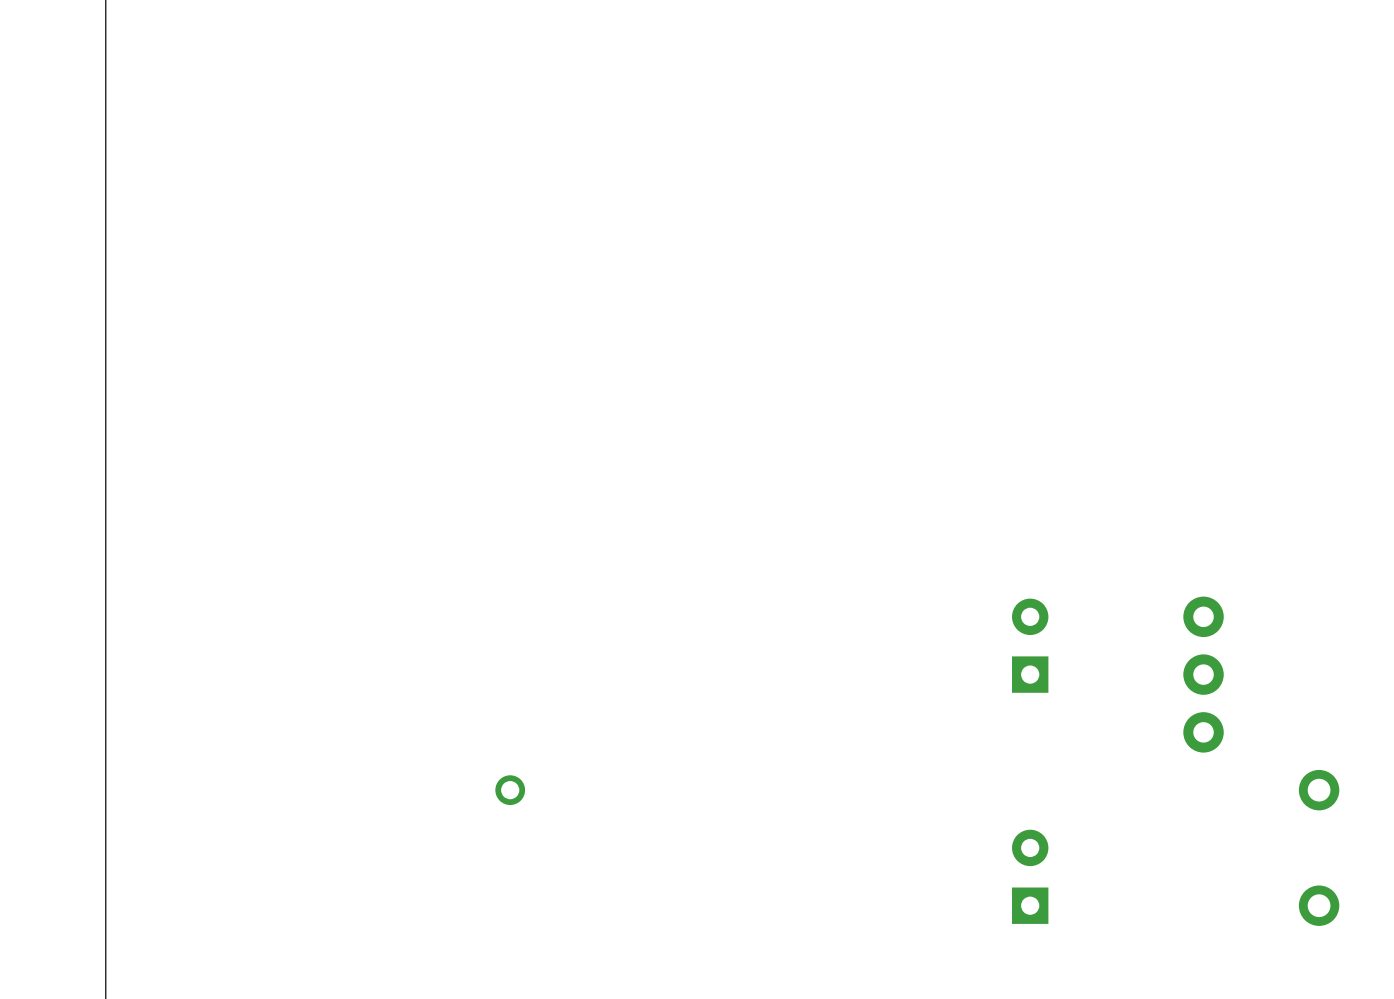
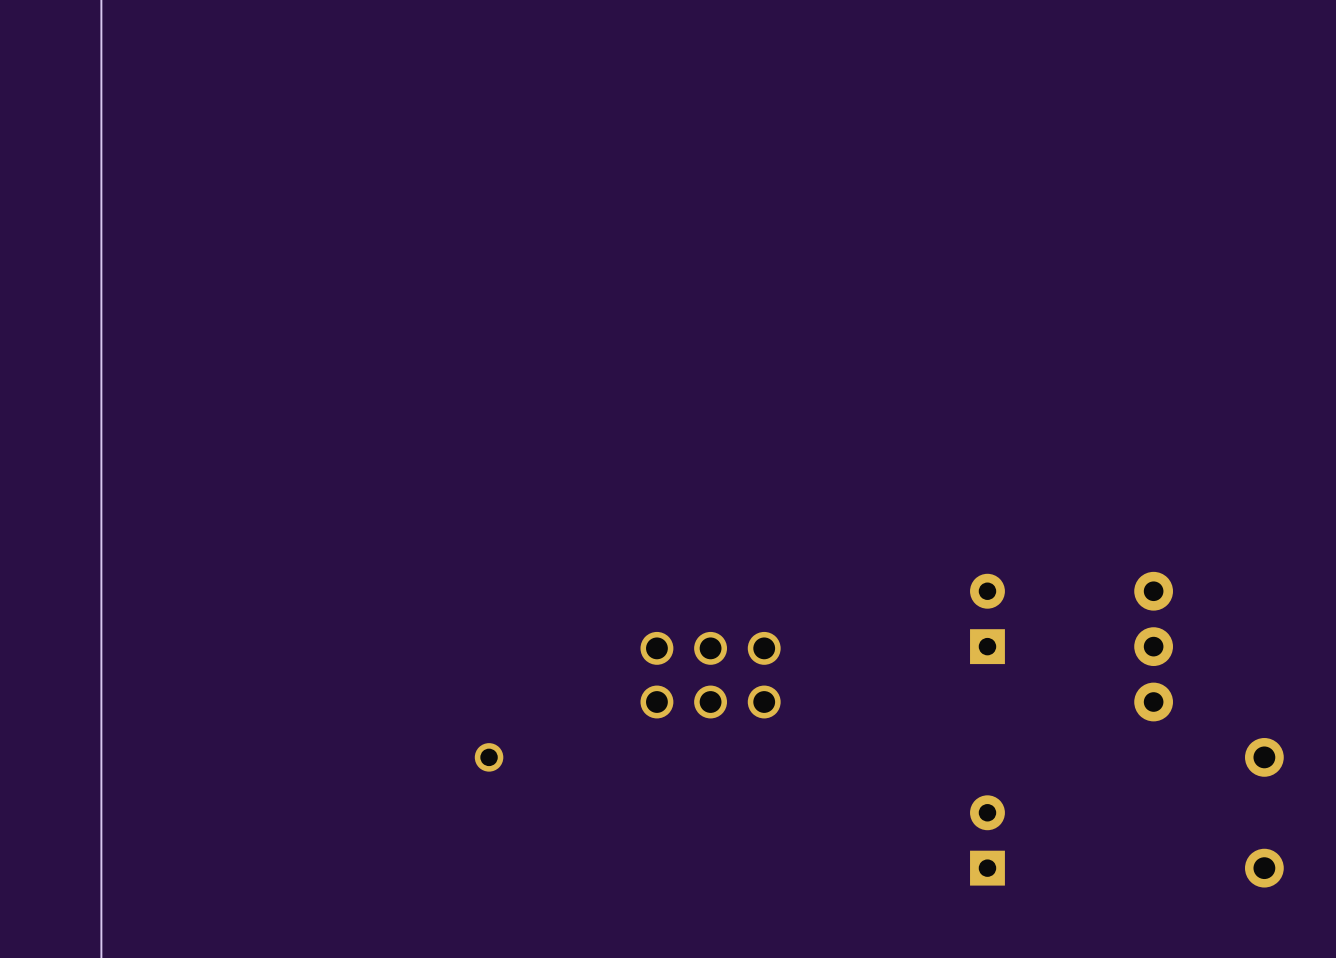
part: none -> (710, 675)

